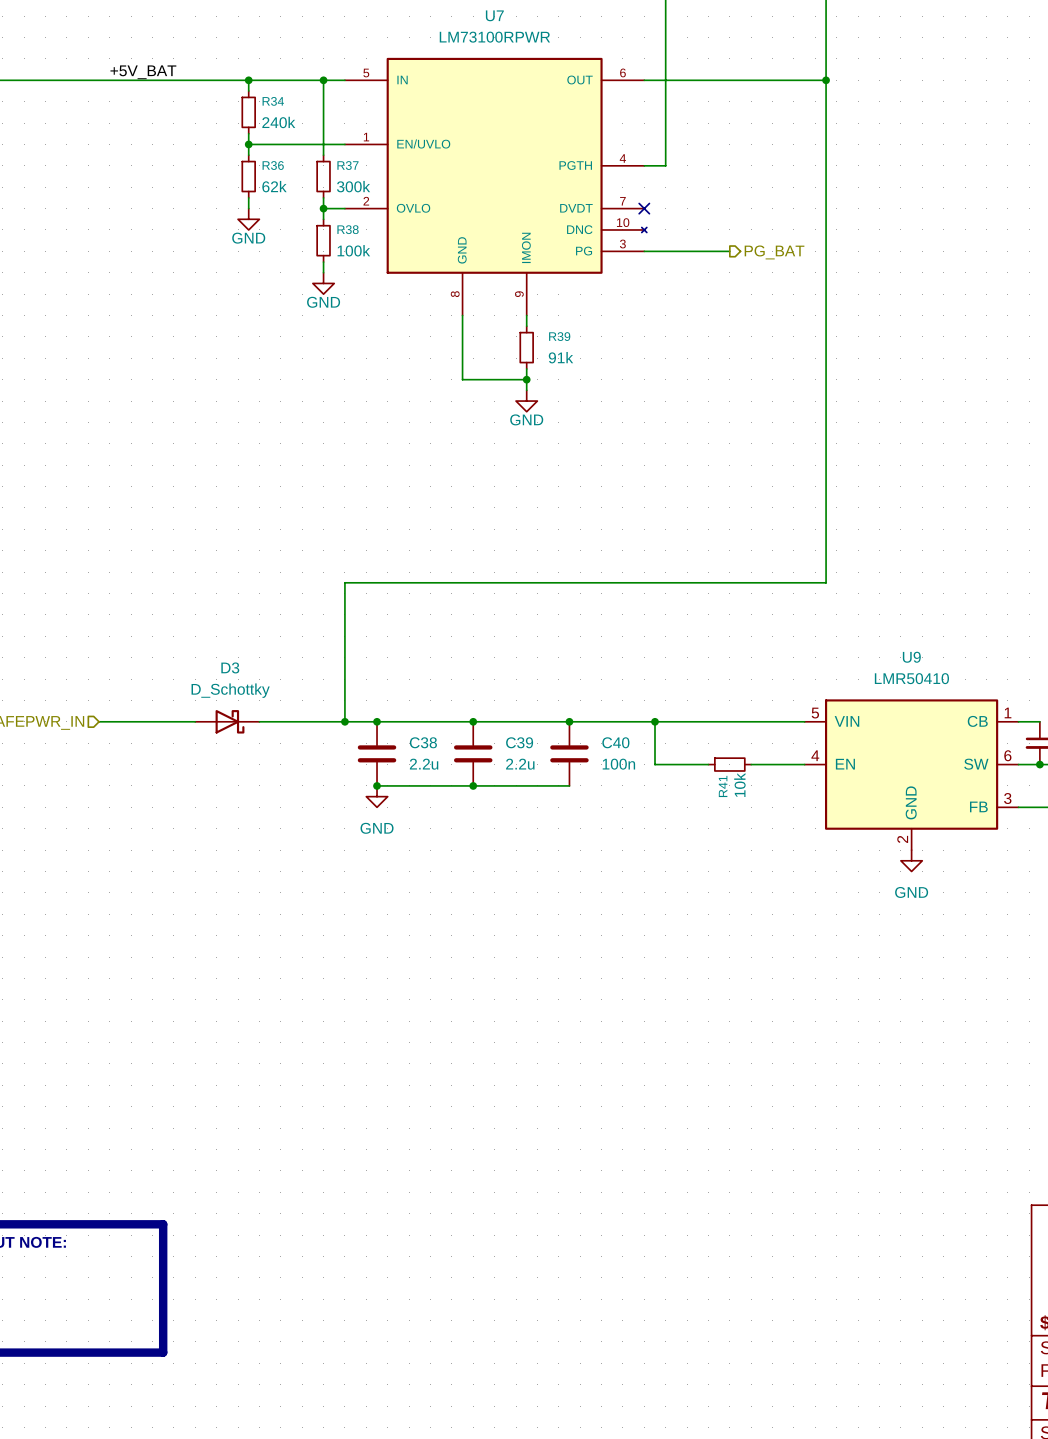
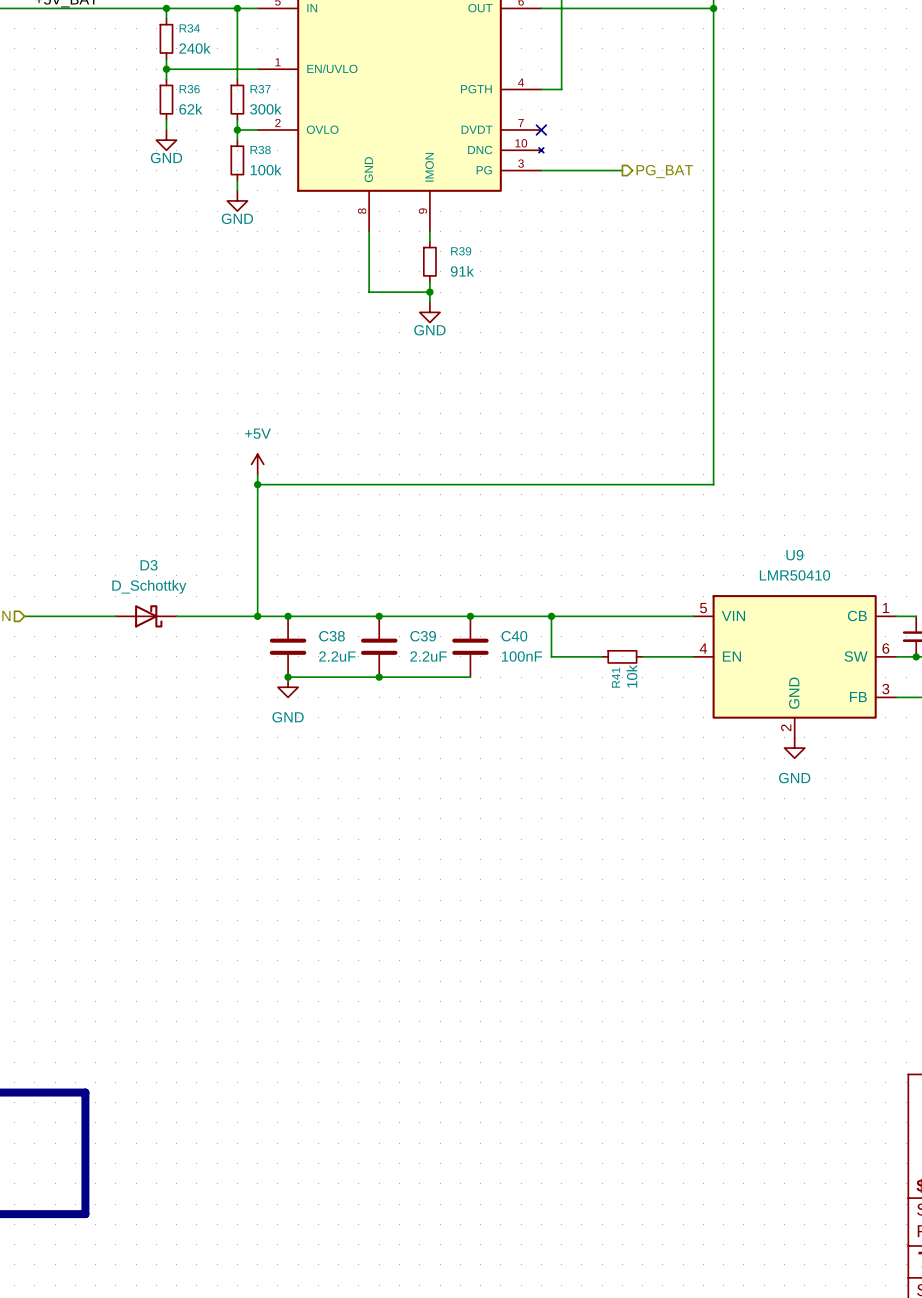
power symbol: none -> +5V (257, 464)
wire: none -> (257, 474) (257, 484)
junction: none -> (257, 484)
C38 value: 2.2u (424, 764) -> 2.2uF (337, 656)
C39 value: 2.2u (520, 764) -> 2.2uF (428, 656)
C40 value: 100n (618, 764) -> 100nF (521, 656)

